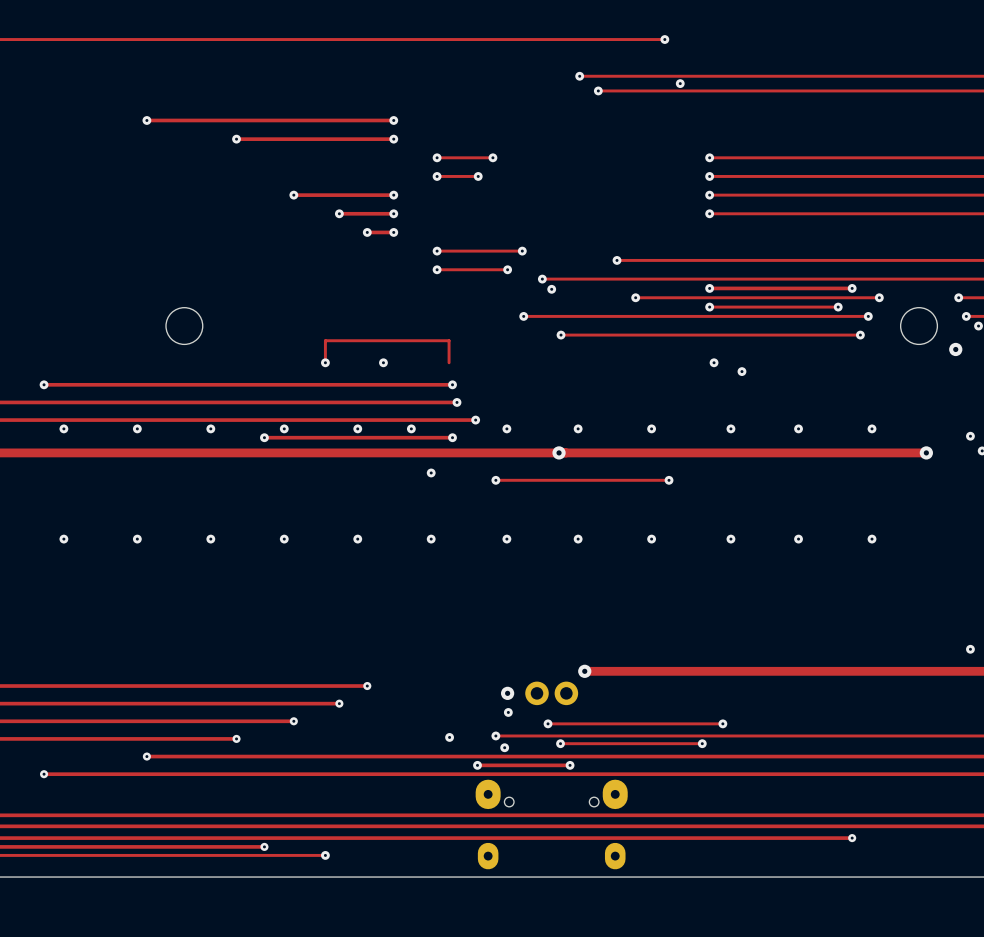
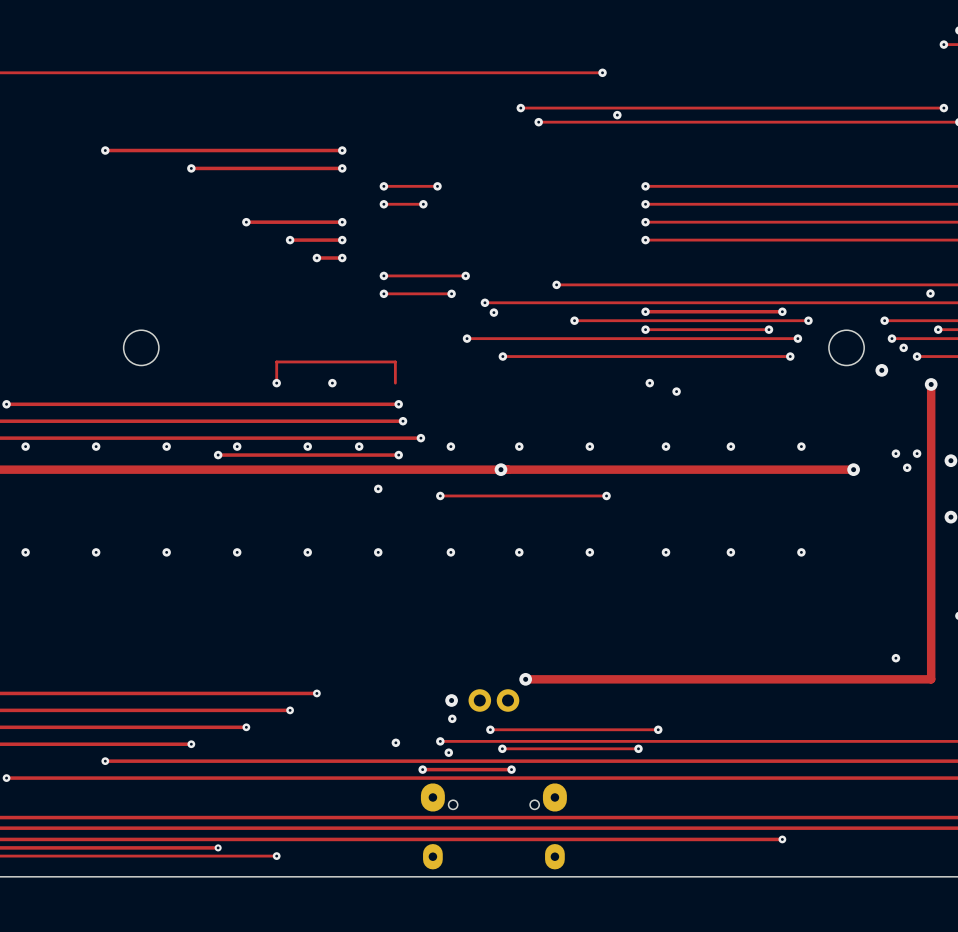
via position: (264, 846) -> (276, 856)
via: none -> (218, 847)
via: (325, 855) -> none

